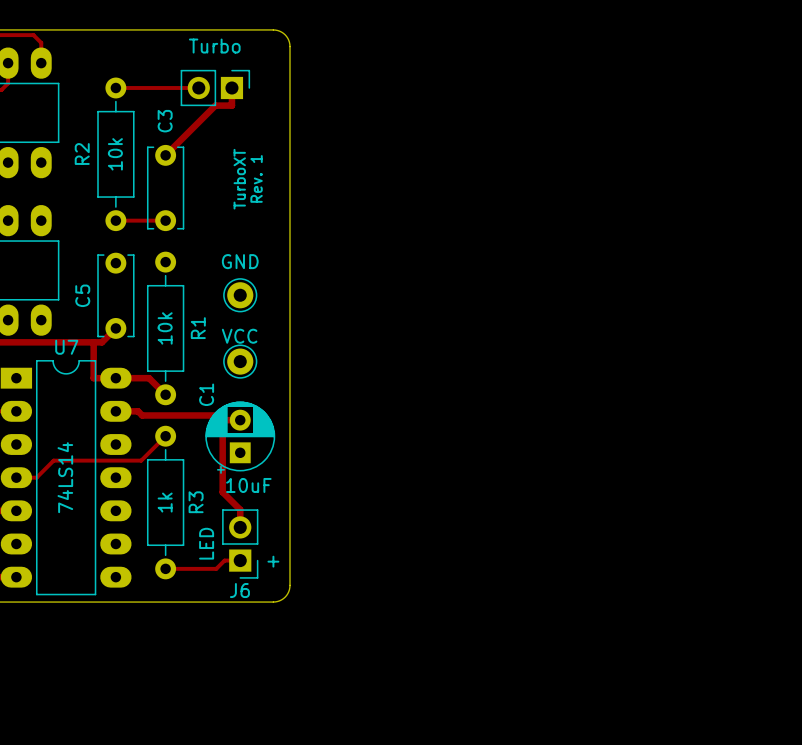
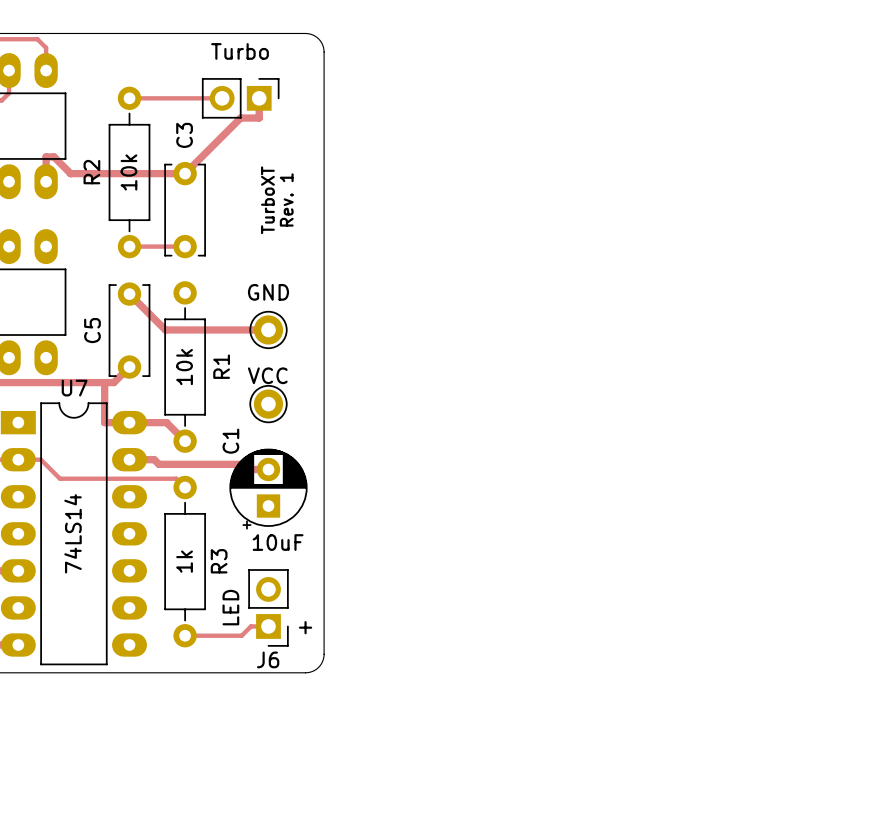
track: none -> (185, 173) (70, 173) (53, 156) (46, 156) (46, 181)
track: none -> (129, 294) (165, 329) (268, 329)
track: (222, 420) (222, 492) (240, 509) (240, 527) -> none
track: (165, 436) (141, 460) (53, 460) (36, 477) (16, 477) -> (185, 487) (176, 478) (59, 478) (40, 459) (18, 459)

